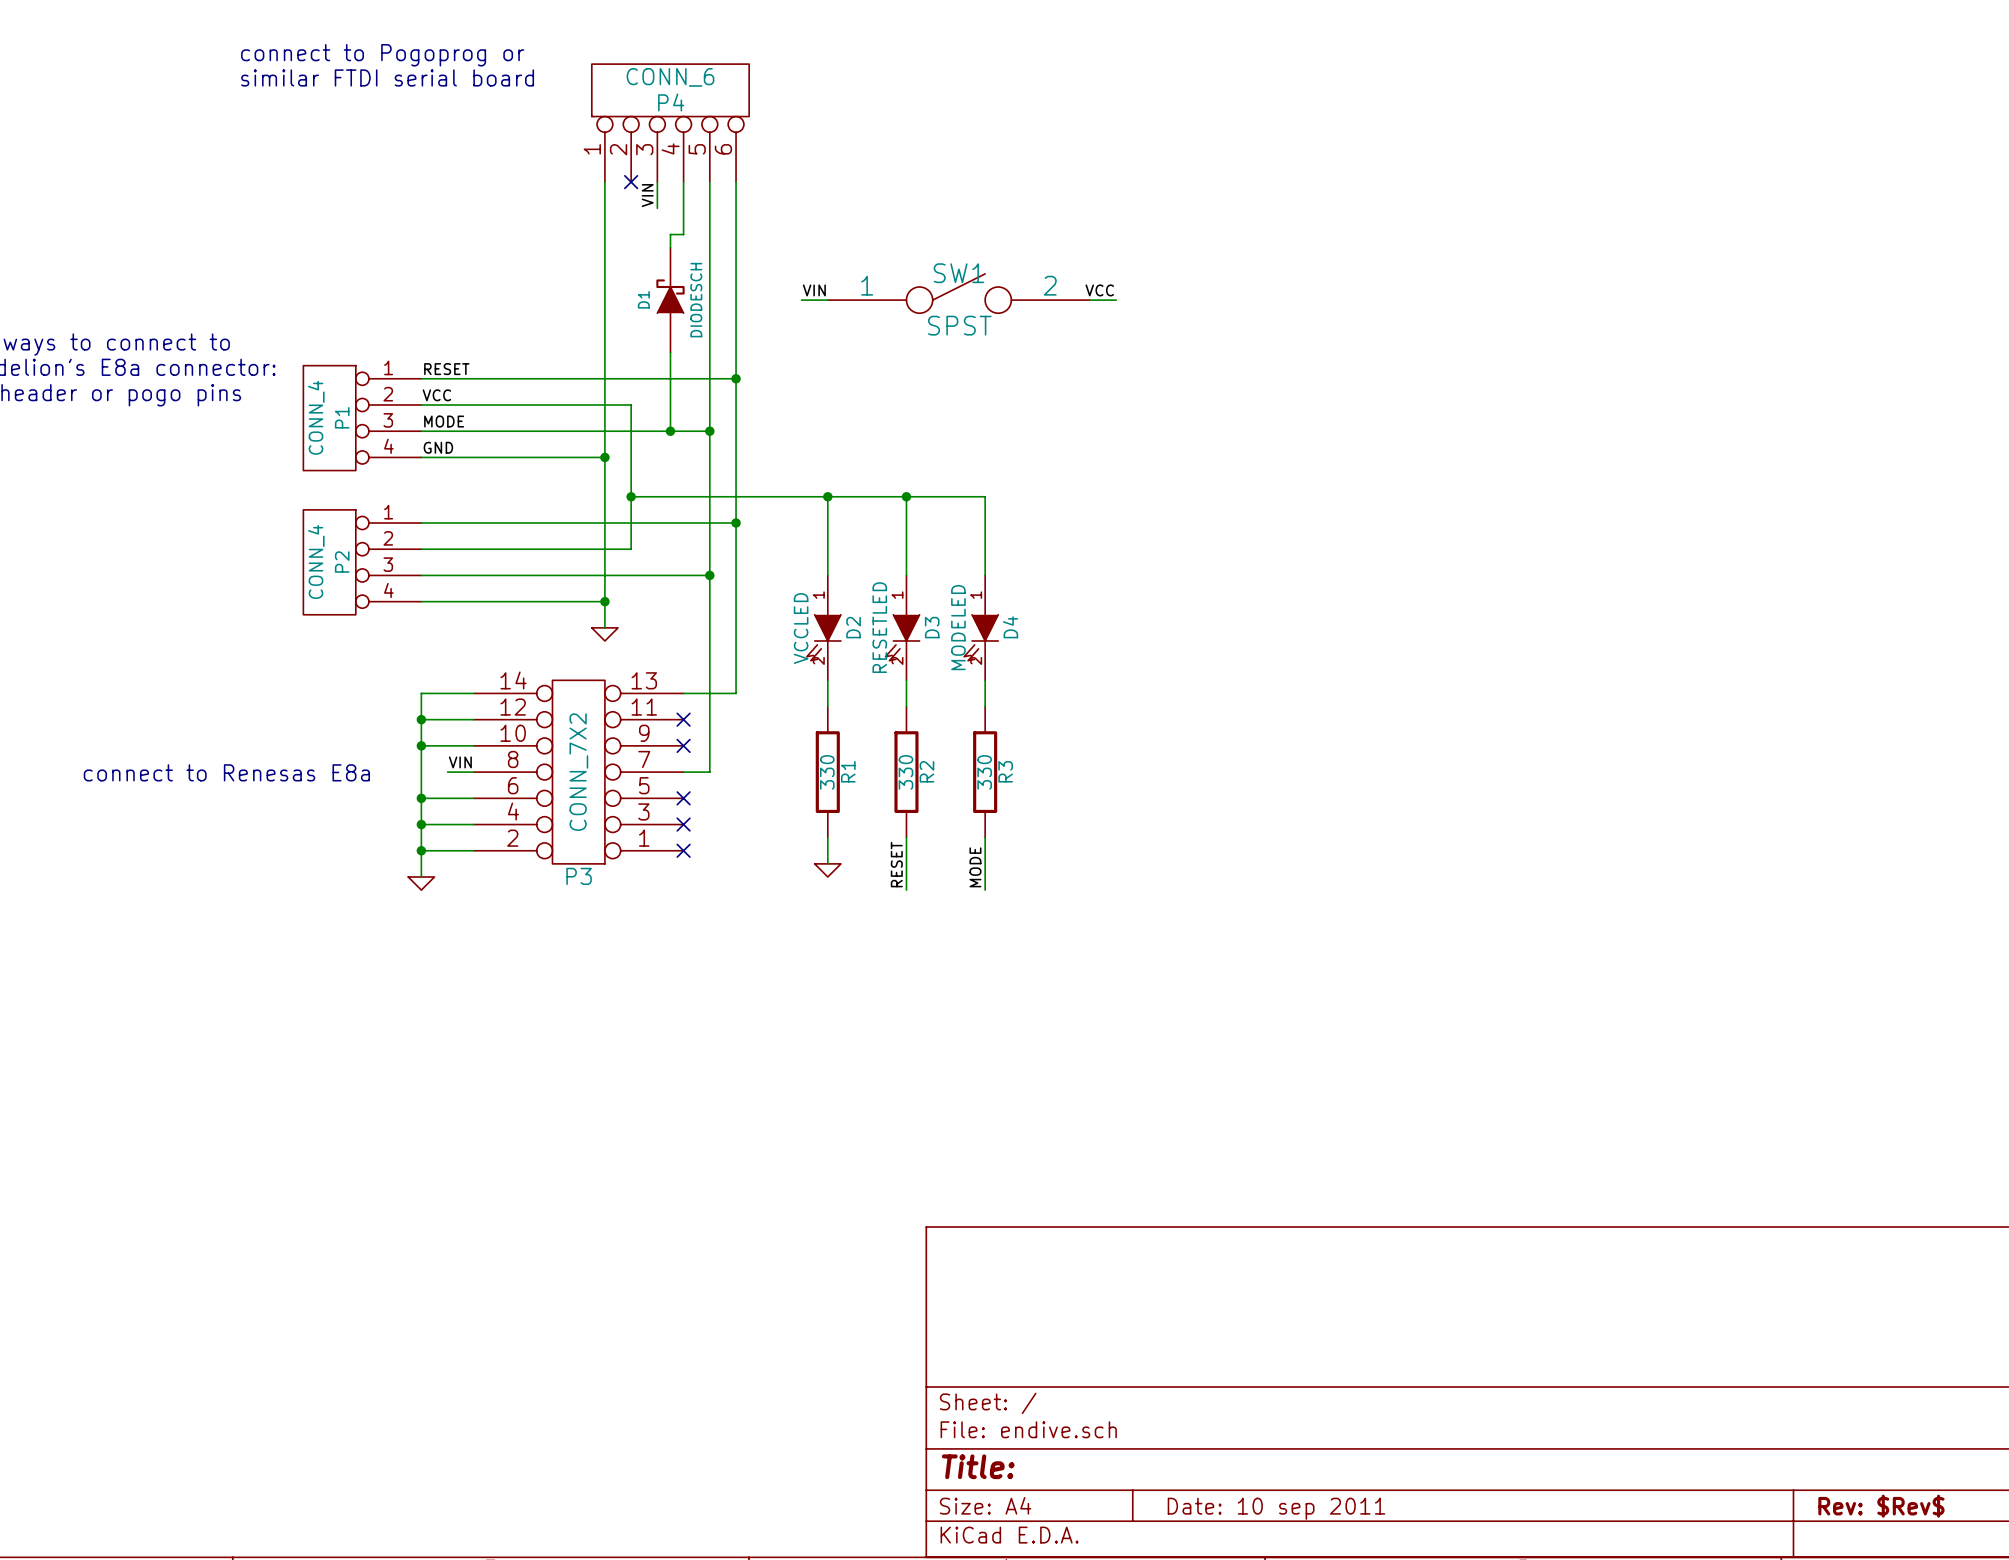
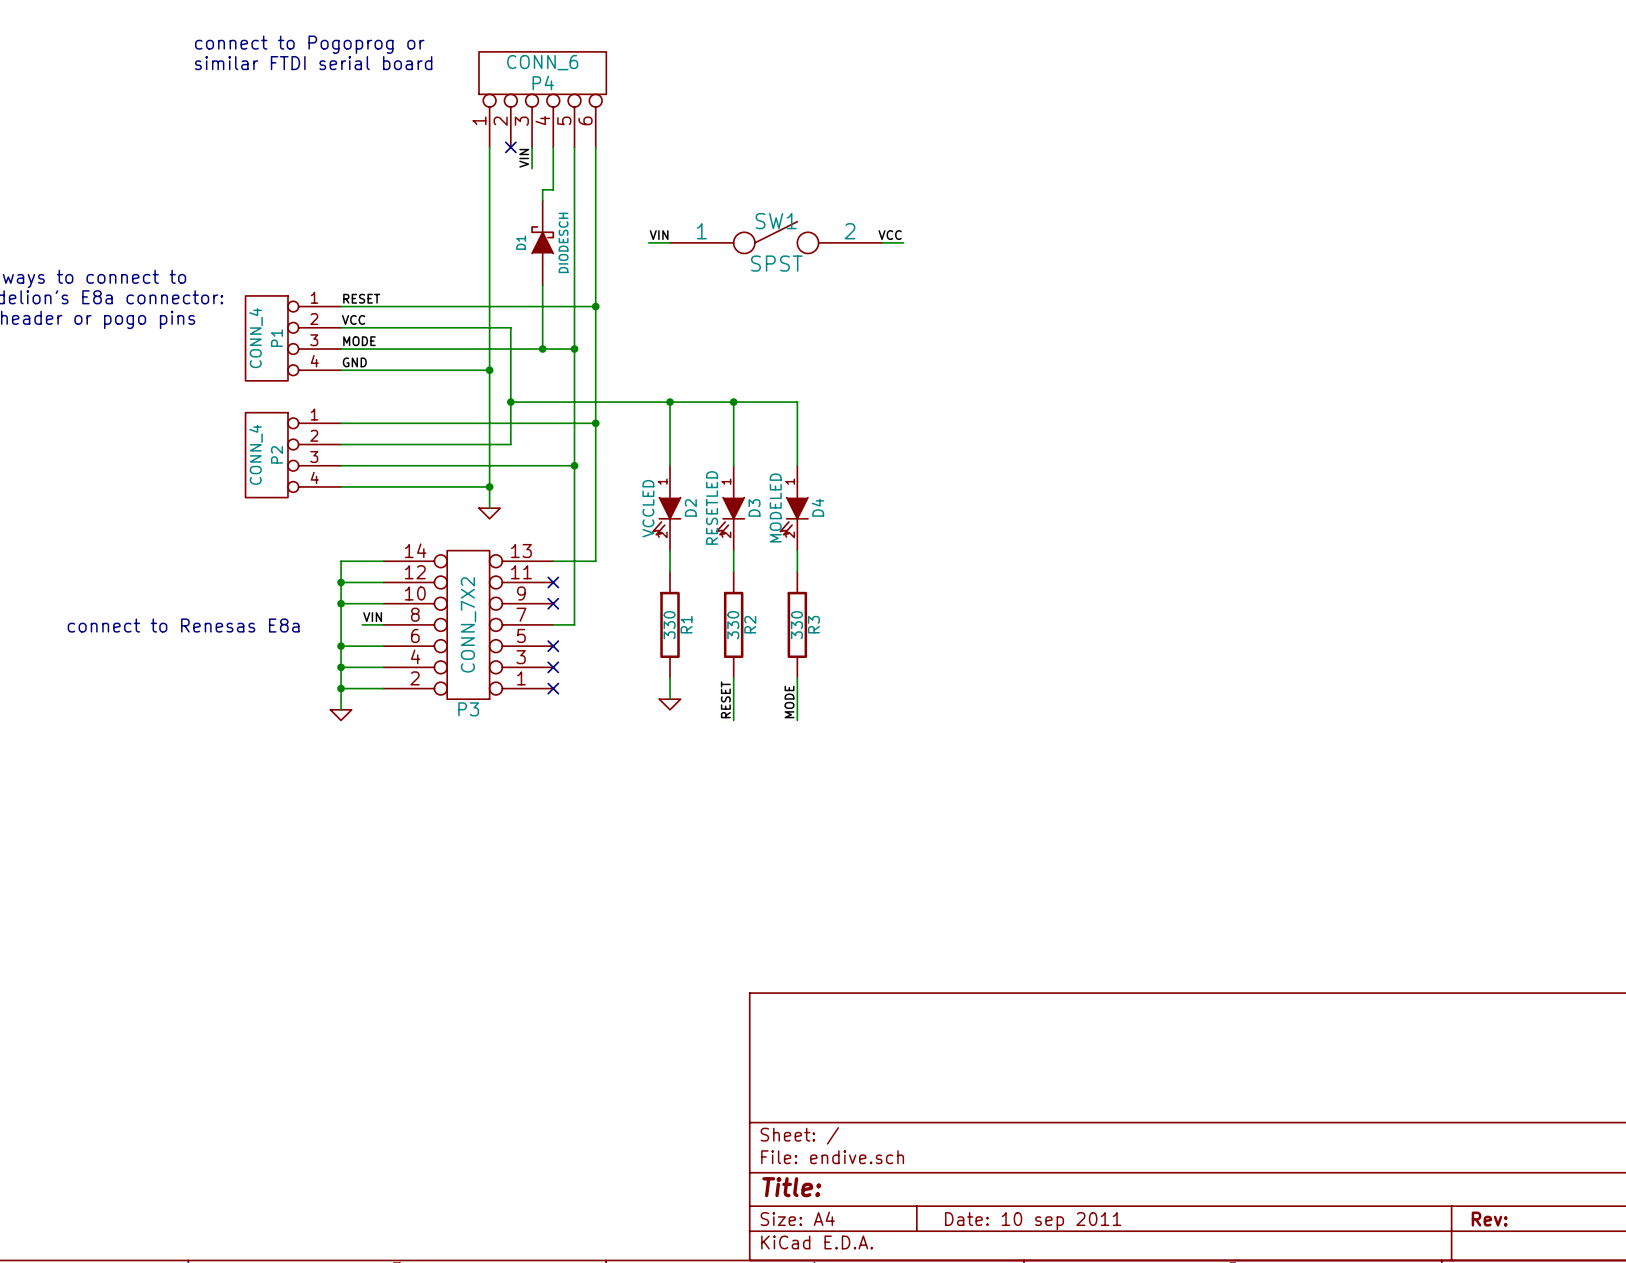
title block: Rev: $Rev$ (1881, 1506) -> Rev: (1489, 1219)

